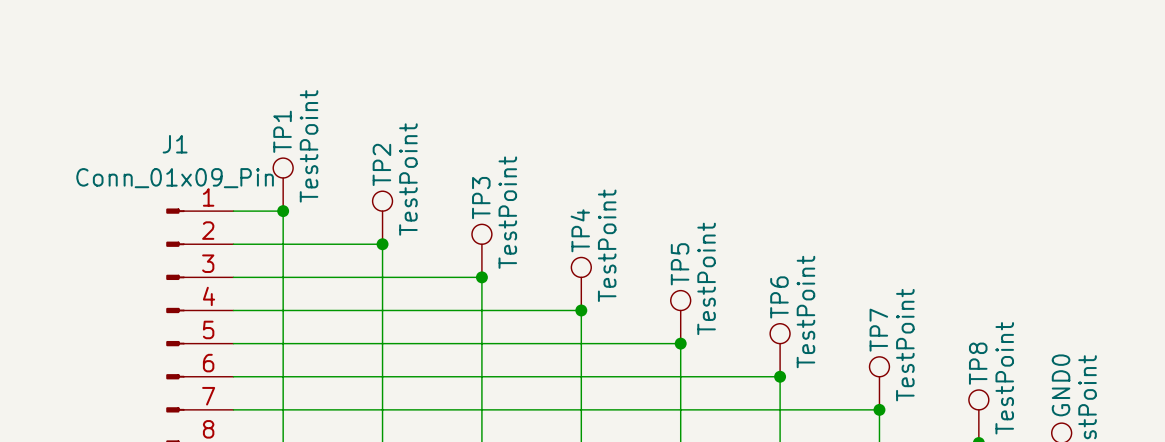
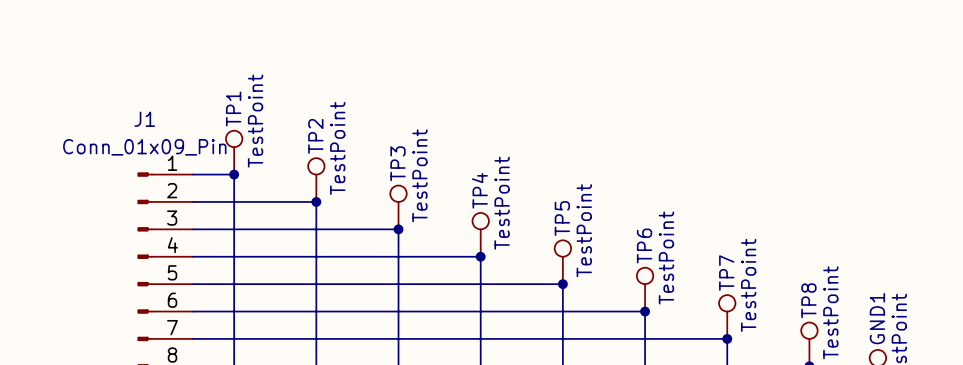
GND0 name: GND0 (1061, 385) -> GND1 (877, 318)

